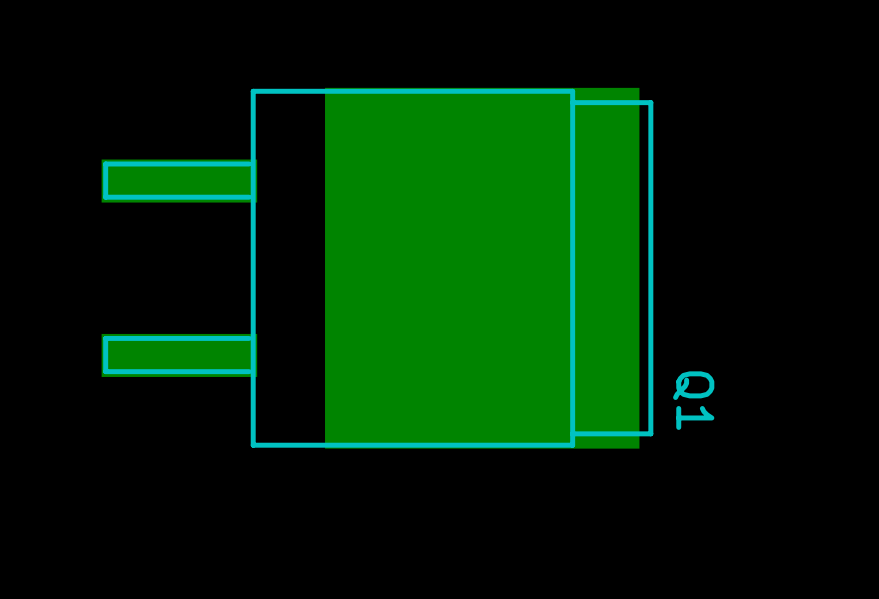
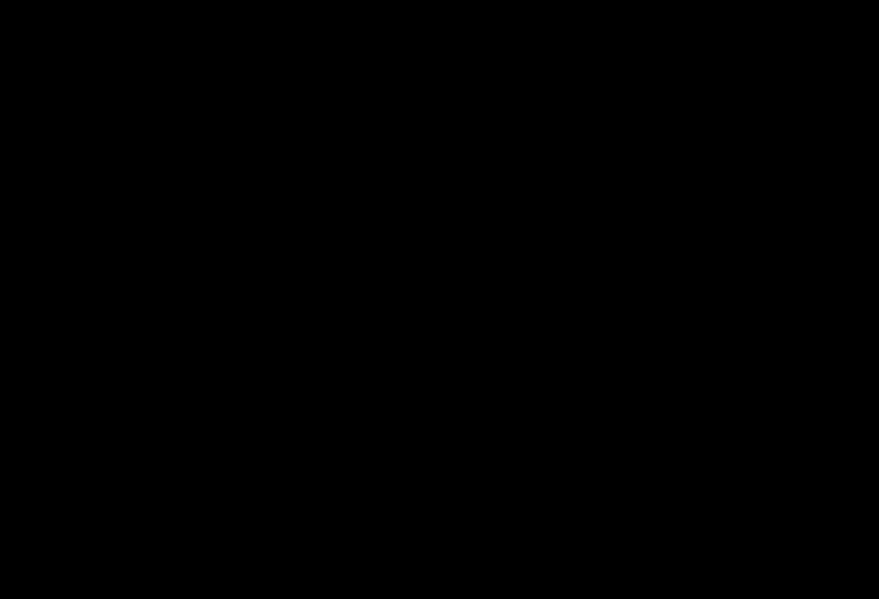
Q1: (377, 268) -> none

